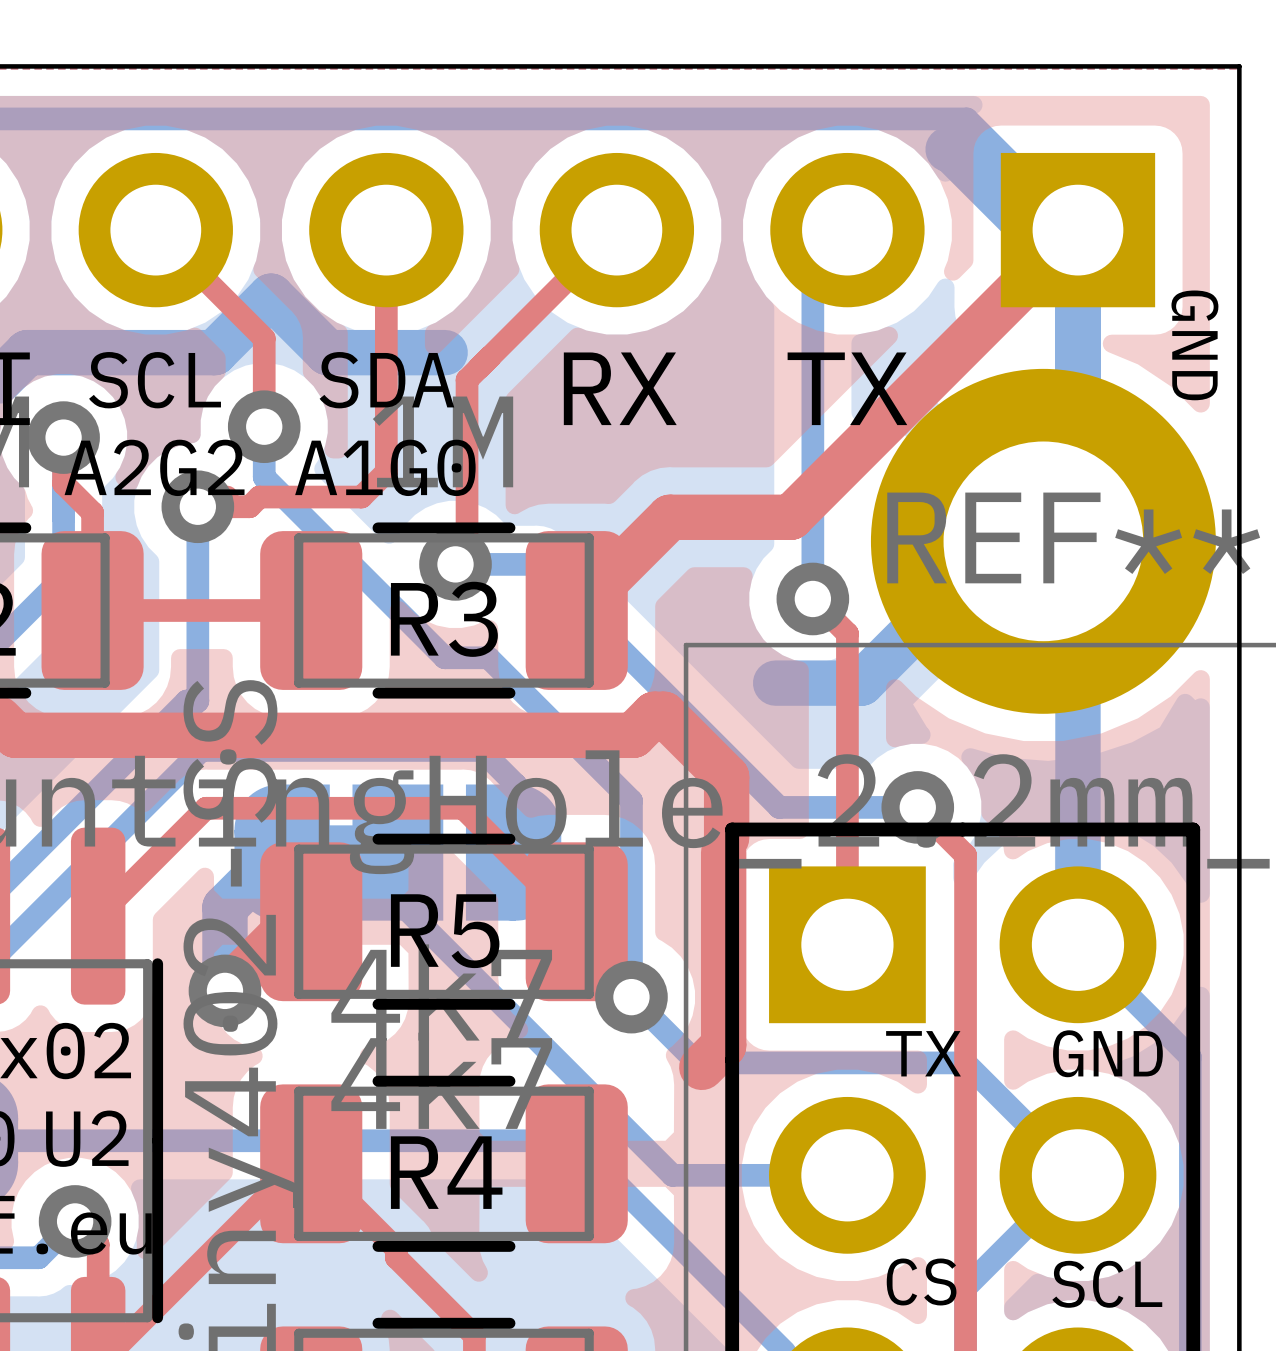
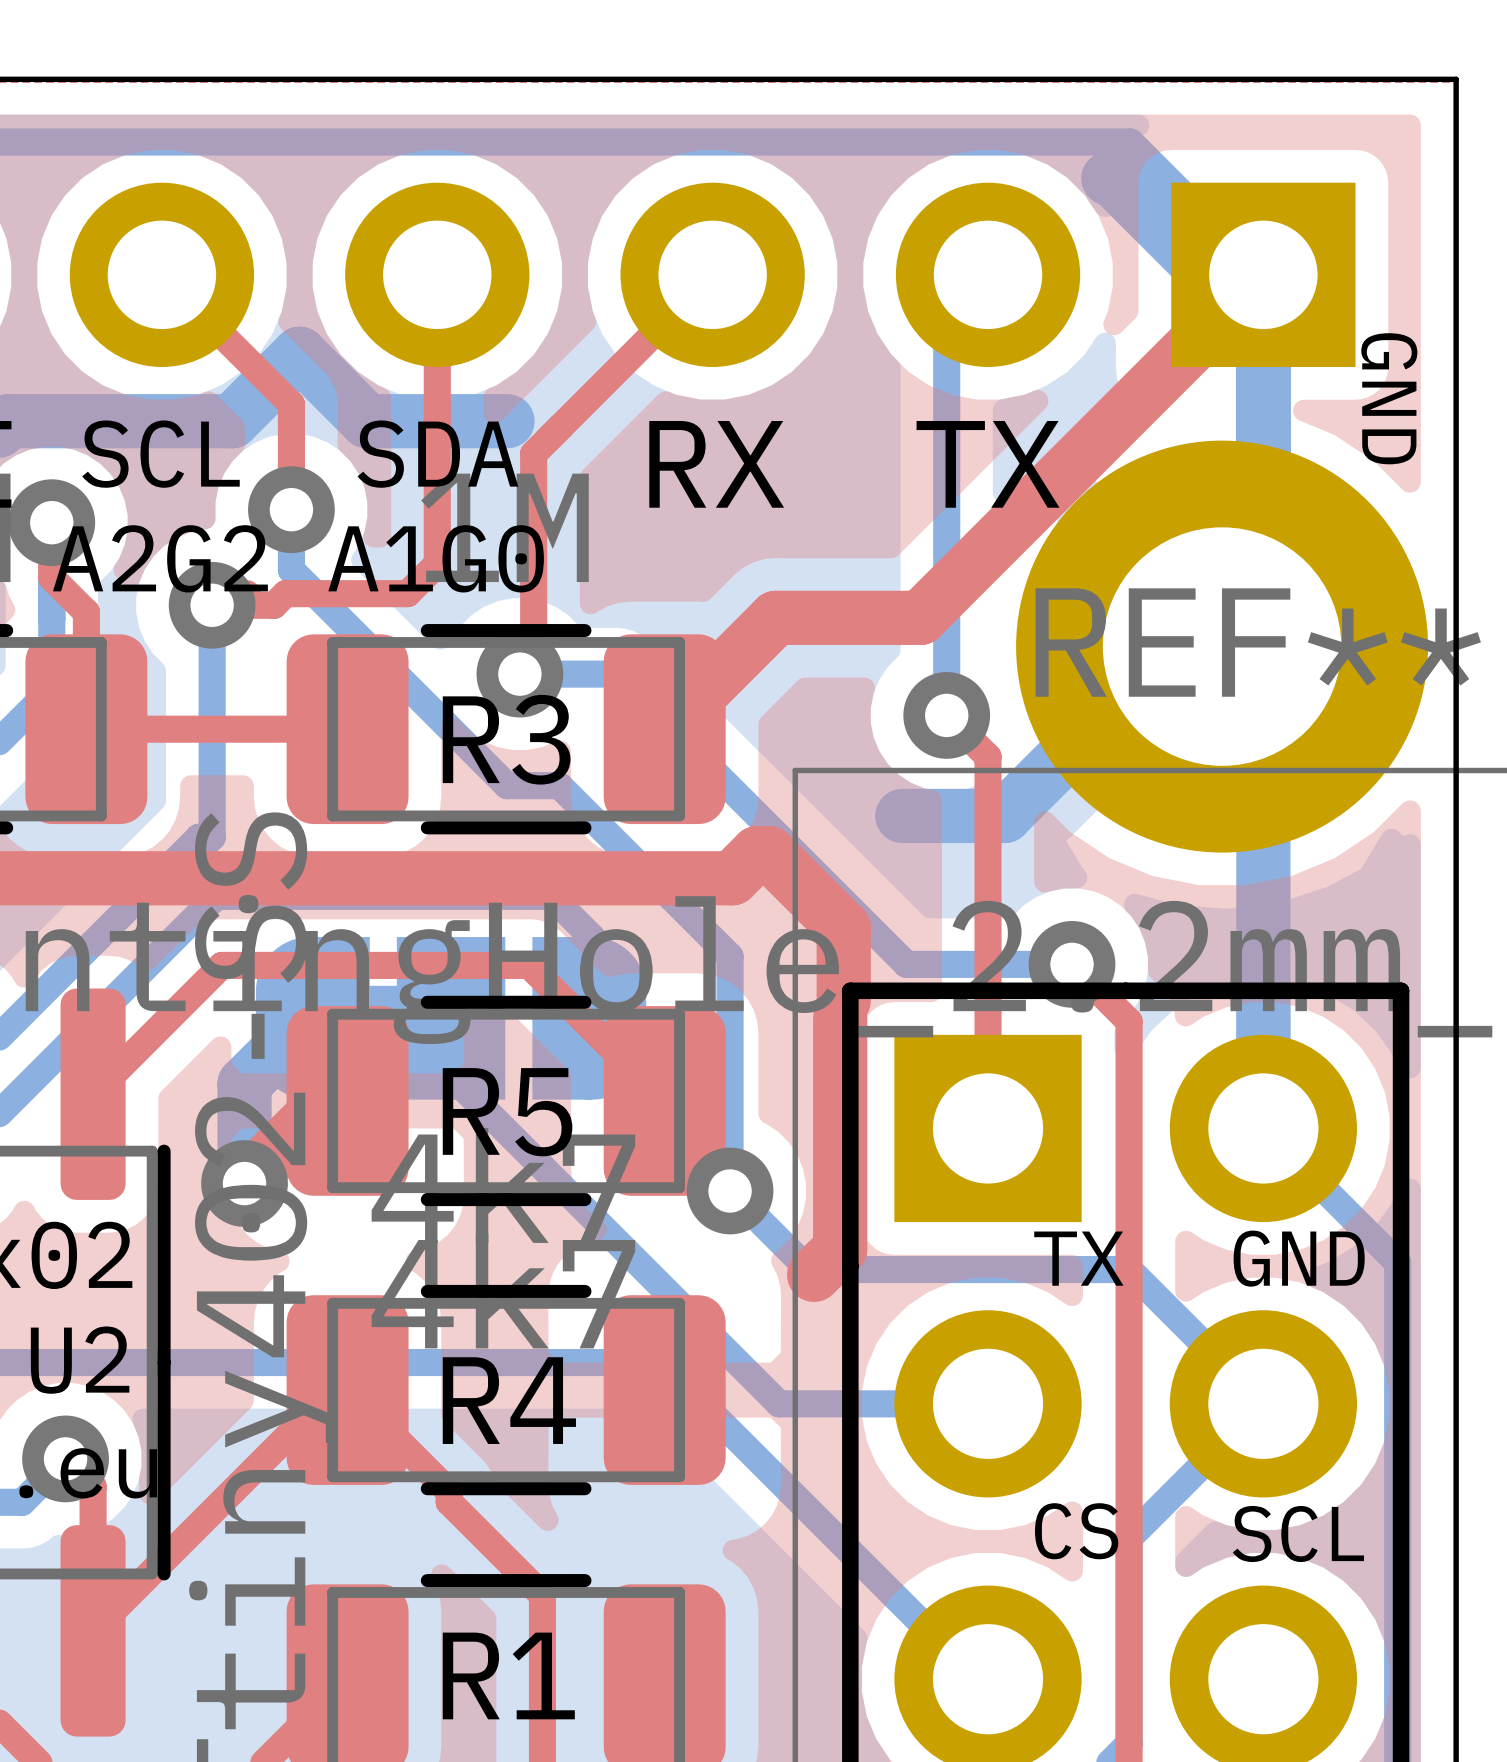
text position: GND (1194, 345) -> GND (1389, 398)

